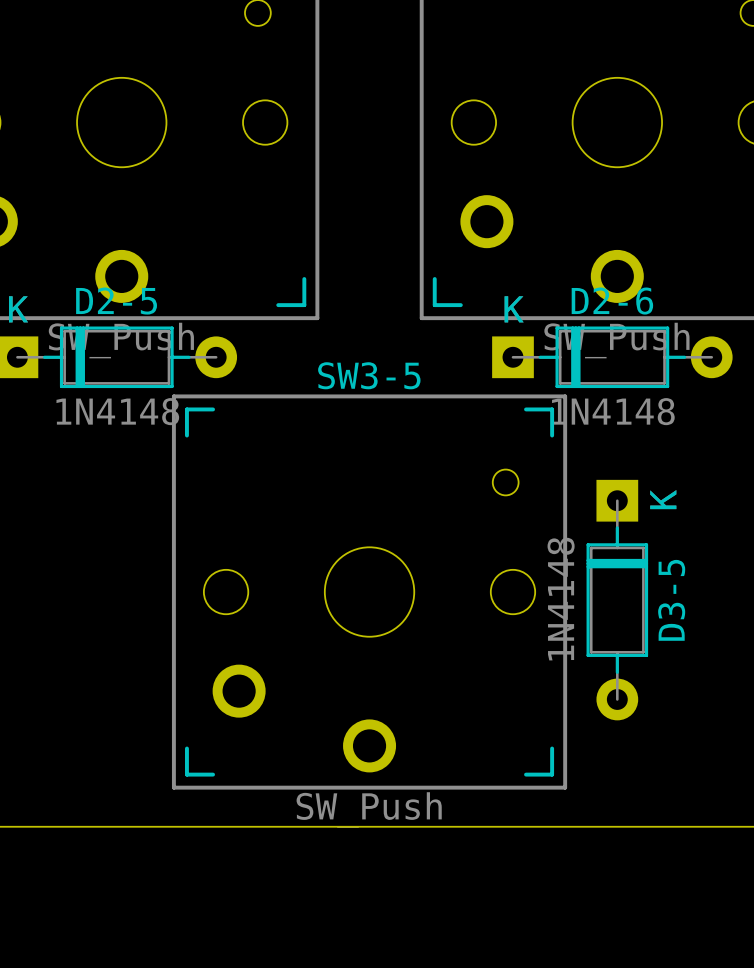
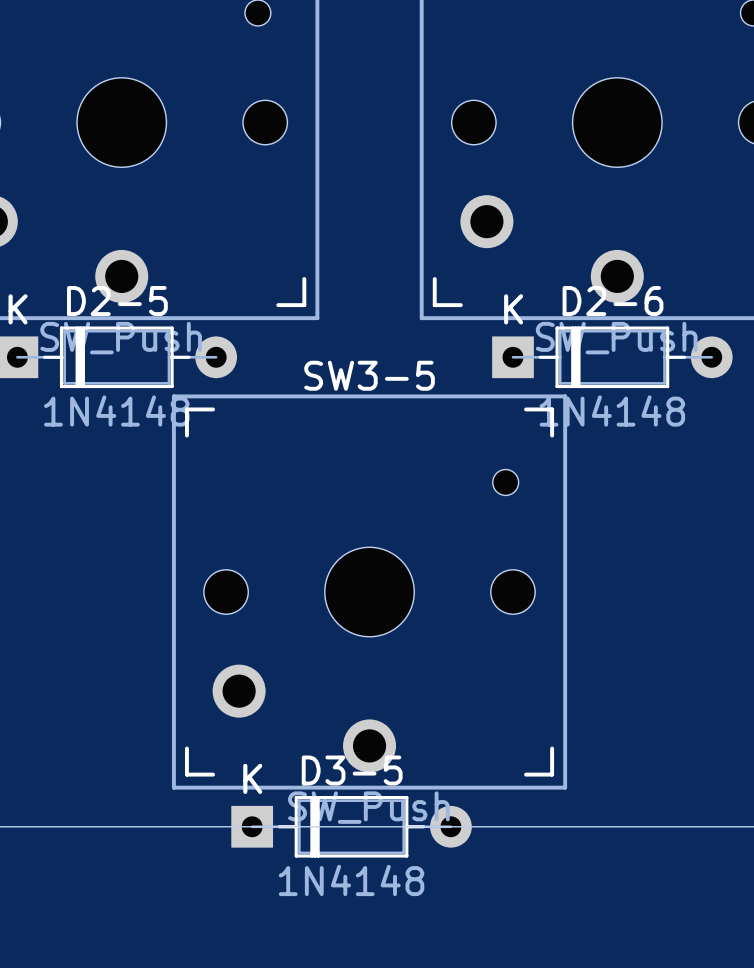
D3-5 rotation: 0° (617, 600) -> 90° counterclockwise (351, 826)
D3-5 position: (617, 600) -> (351, 826)

